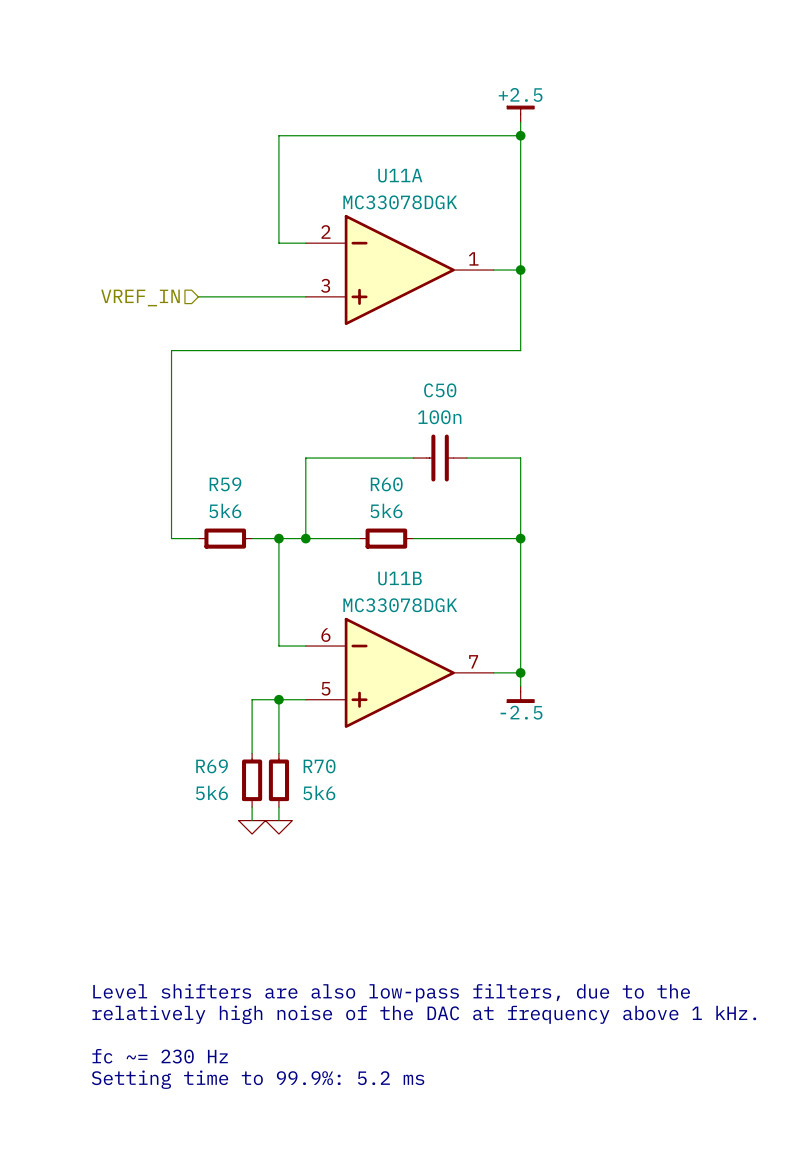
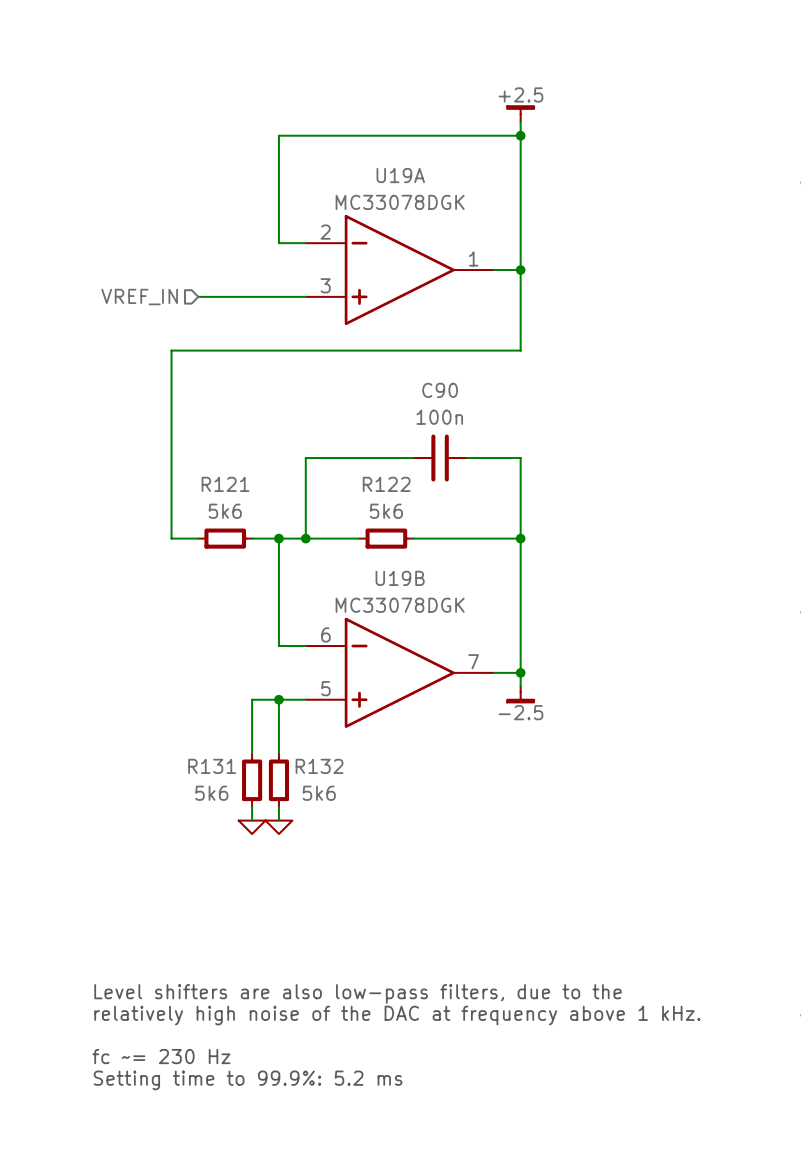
U11A name: U11A (400, 175) -> U19A (400, 175)
C50 name: C50 (440, 390) -> C90 (440, 390)
R59 name: R59 (225, 484) -> R121 (225, 484)
R60 name: R60 (386, 484) -> R122 (386, 484)
U11B name: U11B (400, 578) -> U19B (400, 578)
R69 name: R69 (212, 766) -> R131 (212, 766)
R70 name: R70 (319, 766) -> R132 (319, 766)

